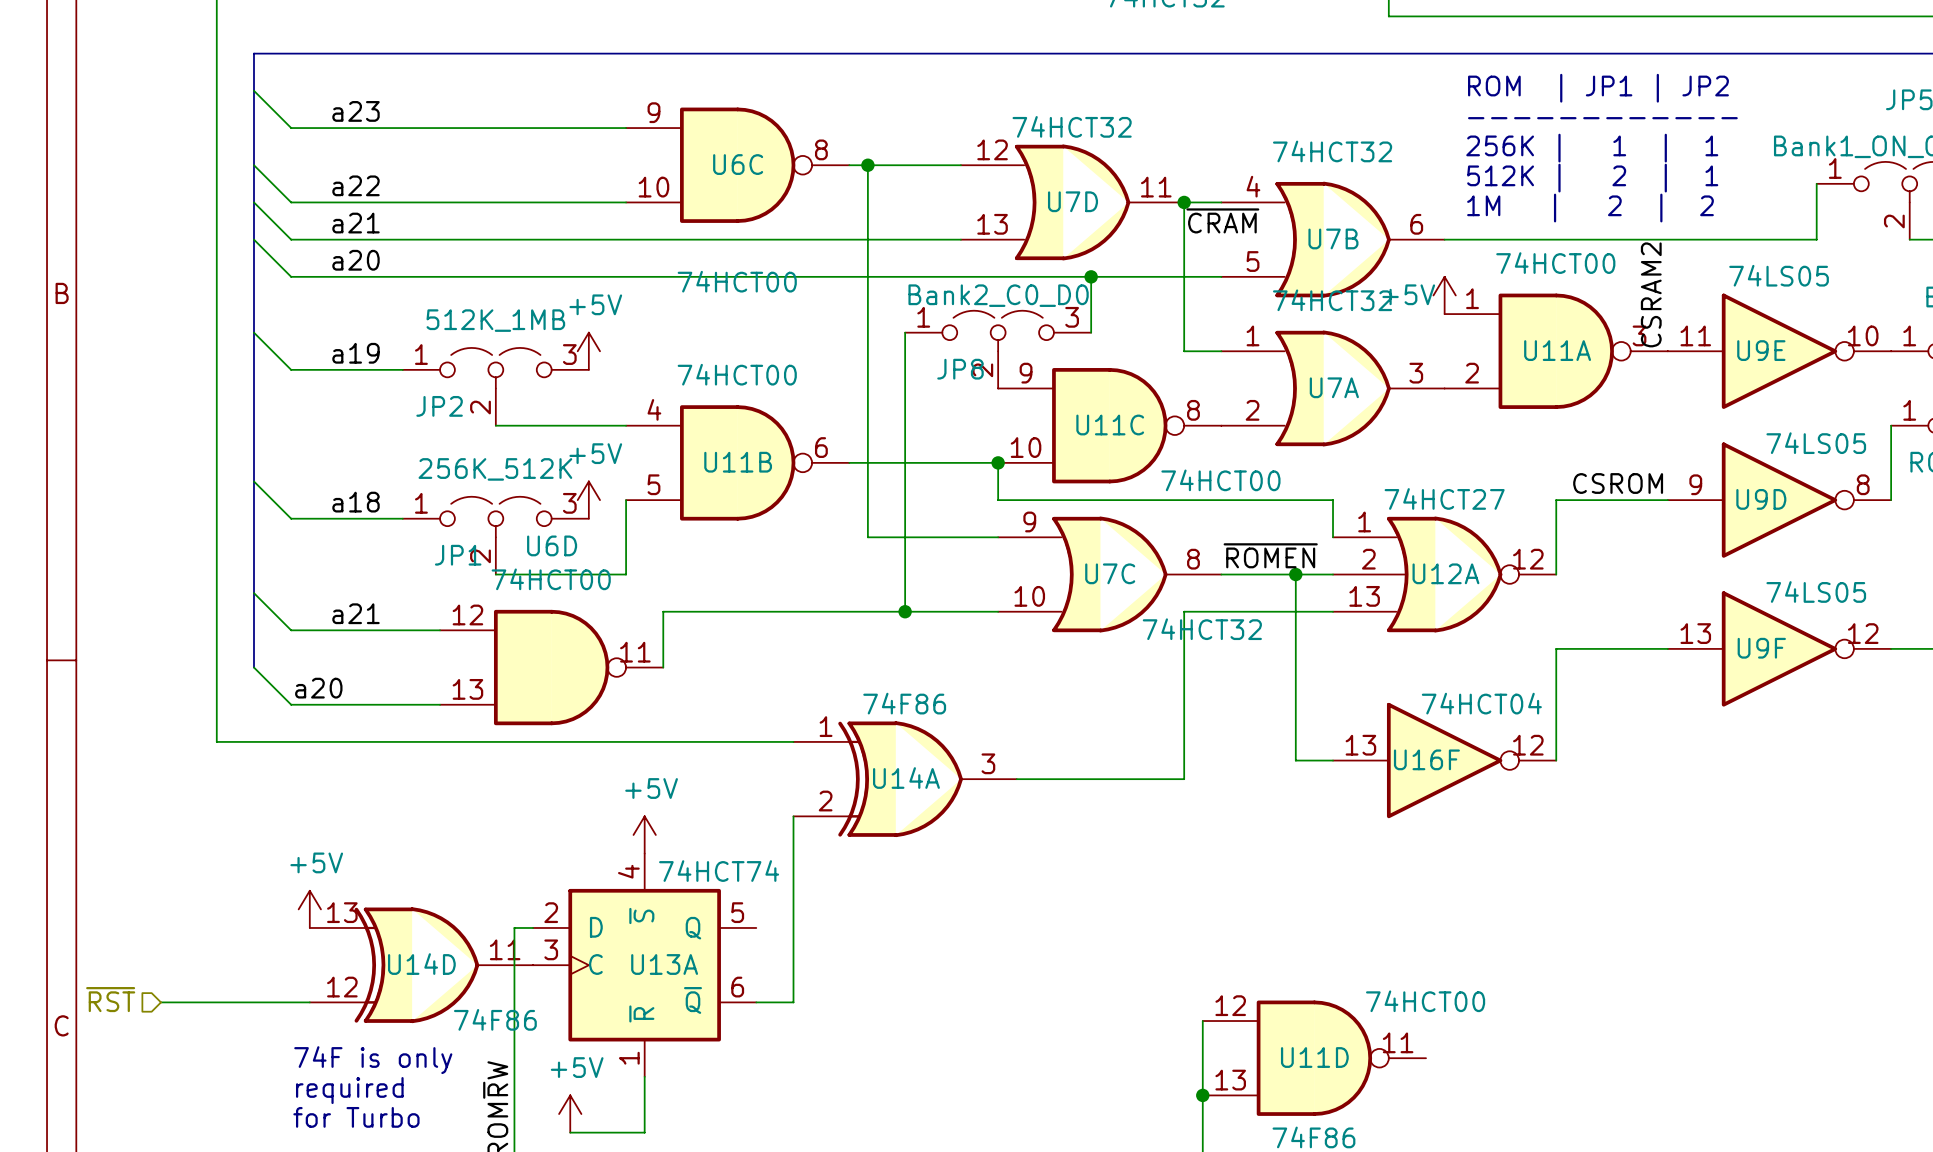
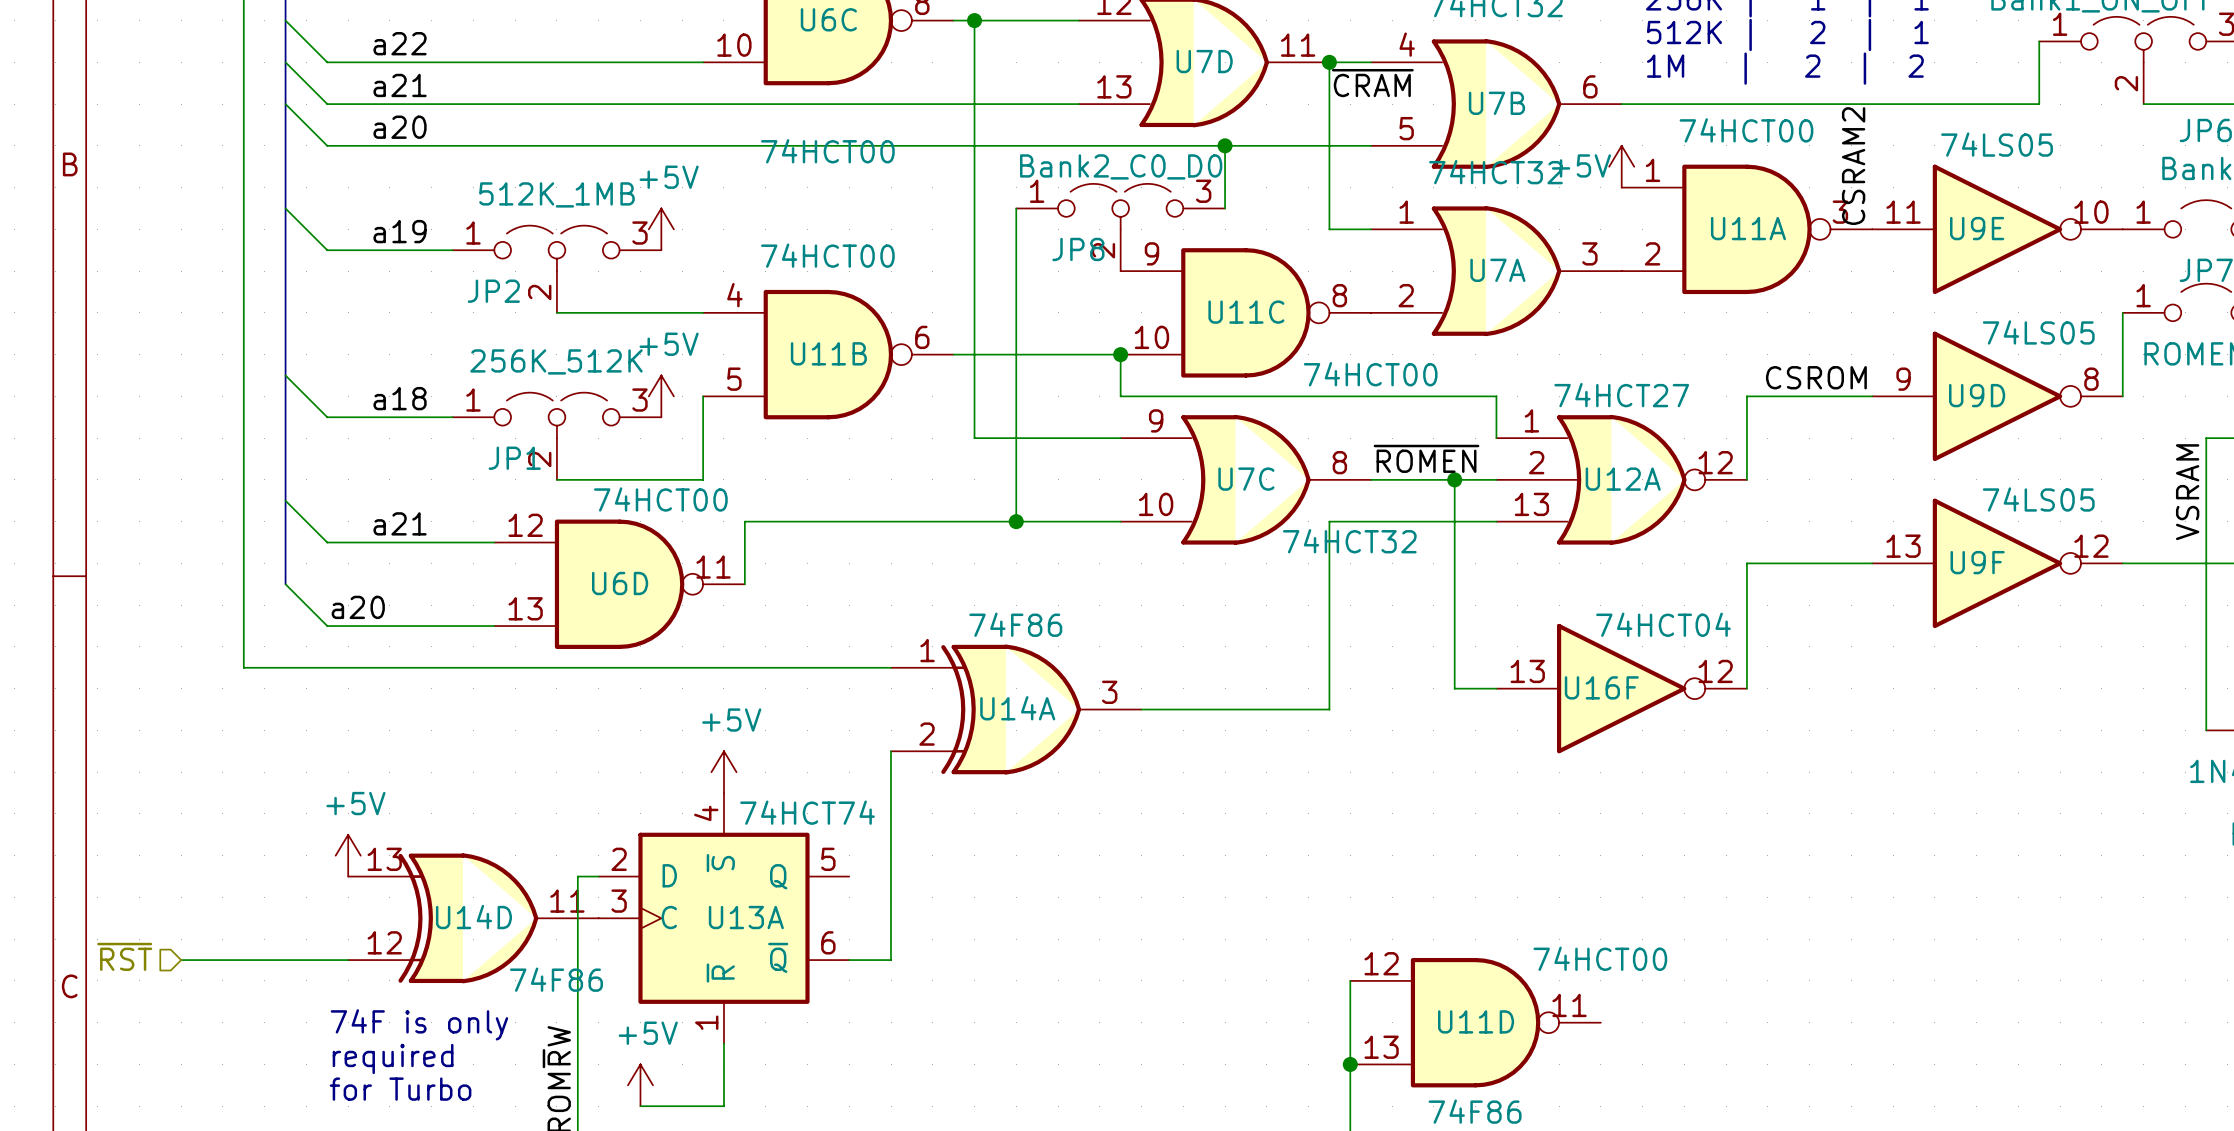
U6D name position: U6D (552, 545) -> U6D (620, 583)
U6D value position: 74HCT00 (551, 579) -> 74HCT00 (660, 499)

